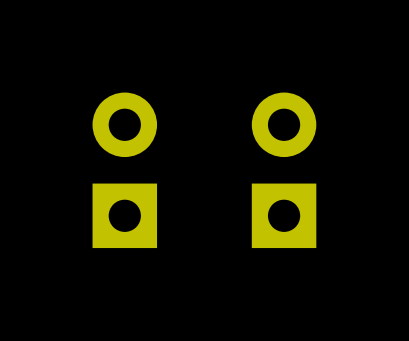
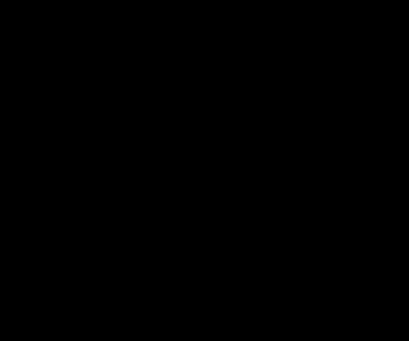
part: (124, 170) -> none
part: (284, 170) -> none

